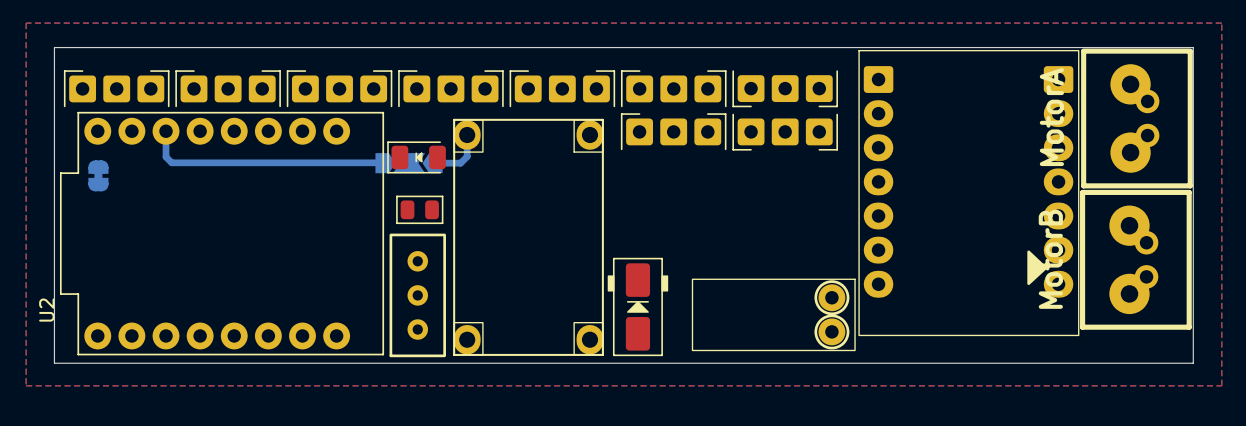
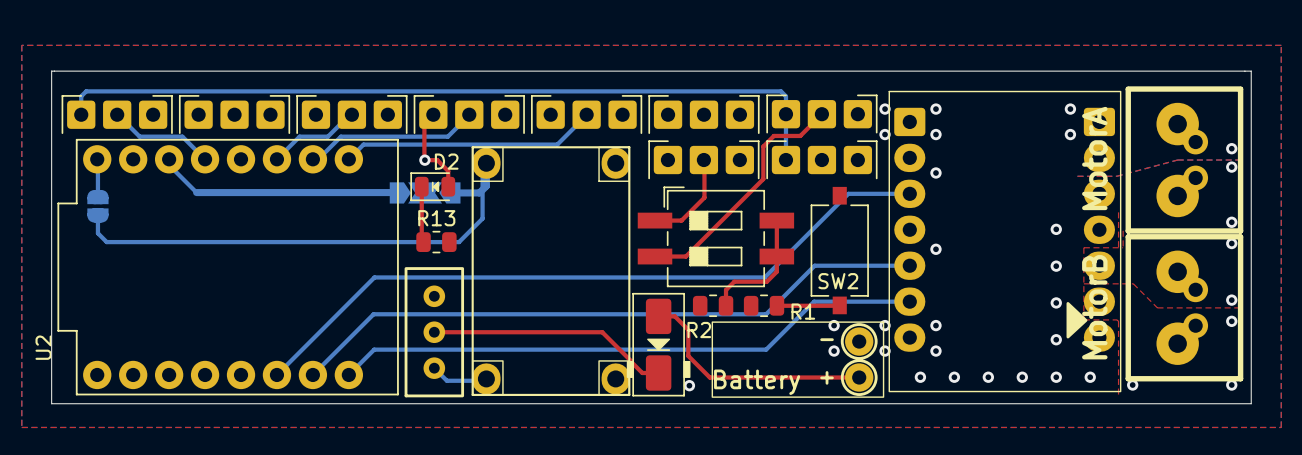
via: none -> (885, 109)
via: none -> (935, 109)
via: none -> (1070, 109)
bottom track: none -> (81, 114) (81, 96) (86, 91) (781, 91) (785, 96) (785, 160)
bottom track: none -> (117, 114) (139, 136) (182, 136) (205, 159)
bottom track: none -> (352, 114) (349, 114) (327, 136) (299, 136) (276, 159)
top track: none -> (433, 114) (424, 124) (424, 159) (437, 160) (448, 171) (448, 186)
bottom track: none -> (469, 114) (447, 136) (340, 136) (318, 159) (312, 159)
bottom track: none -> (587, 114) (557, 144) (363, 144) (348, 159)
top track: none -> (821, 114) (800, 135) (773, 135) (763, 146) (763, 179) (685, 256) (655, 256)
part rotation: 0° (785, 88) -> 180° (821, 113)
via: none -> (885, 134)
via: none -> (935, 134)
via: none -> (1070, 134)
part position: (1136, 118) -> (1184, 160)
via: none -> (1231, 148)
bottom track: none -> (97, 159) (97, 197)
top track: none -> (704, 160) (704, 197) (681, 220) (655, 220)
top zone outline: none -> (1240, 160) (1177, 160) (1116, 176) (1077, 176)
via: none -> (424, 160)
part rotation: 0° (785, 132) -> 180° (821, 159)
bottom track: (166, 136) (166, 157) (171, 162) (192, 162) -> (169, 165) (196, 192)
bottom track: none -> (482, 165) (482, 218) (459, 242) (106, 242) (97, 233) (97, 215)
via: none -> (1231, 167)
via: none -> (935, 172)
top track: none -> (421, 186) (421, 240) (423, 242)
part: (416, 157) -> none
D2: none -> (432, 186)
part footprint: [88, 160, 109, 192] -> [87, 190, 109, 223]
bottom track: none -> (909, 193) (848, 193) (764, 277) (374, 277) (276, 374)
top zone outline: none -> (1118, 212) (1118, 247)
top track: none -> (776, 220) (776, 271) (766, 281) (734, 281) (726, 290) (726, 305)
via: none -> (1231, 222)
part position: (968, 193) -> (1004, 241)
via: none -> (1056, 229)
top zone outline: none -> (1123, 230) (1123, 247) (1083, 247) (1083, 319) (1118, 321) (1118, 396)
part: none -> (715, 236)
part: (419, 209) -> none
R13: none -> (436, 242)
via: none -> (1231, 243)
via: none -> (935, 249)
SW2: none -> (839, 250)
bottom track: none -> (909, 265) (814, 265) (766, 314) (373, 314) (312, 374)
via: none -> (1056, 266)
top zone outline: none -> (1083, 283) (1133, 283) (1157, 307) (1240, 307)
part position: (1135, 259) -> (1184, 307)
via: none -> (1231, 300)
bottom track: none -> (909, 301) (814, 301) (766, 349) (374, 349) (348, 374)
via: none -> (1056, 302)
top track: none -> (839, 305) (776, 305)
R2: none -> (713, 305)
R1: none -> (764, 305)
top track: none -> (658, 316) (674, 316) (688, 329) (688, 356) (709, 377) (859, 377)
via: none -> (1231, 321)
via: none -> (834, 325)
via: none -> (885, 325)
via: none -> (935, 325)
top track: none -> (434, 332) (602, 332) (642, 372) (658, 372)
text: none -> - (827, 339)
via: none -> (1056, 339)
part rotation: 0° (637, 306) -> 180° (658, 344)
via: none -> (834, 351)
via: none -> (885, 351)
via: none -> (935, 351)
part position: (773, 314) -> (797, 359)
bottom track: none -> (434, 368) (446, 380) (482, 380)
text: none -> + (827, 377)
via: none -> (920, 377)
via: none -> (954, 377)
via: none -> (988, 377)
via: none -> (1022, 377)
via: none -> (1056, 377)
via: none -> (1090, 377)
text: none -> Battery (757, 382)
via: none -> (1132, 385)
via: none -> (1231, 385)
via: none -> (689, 385)

